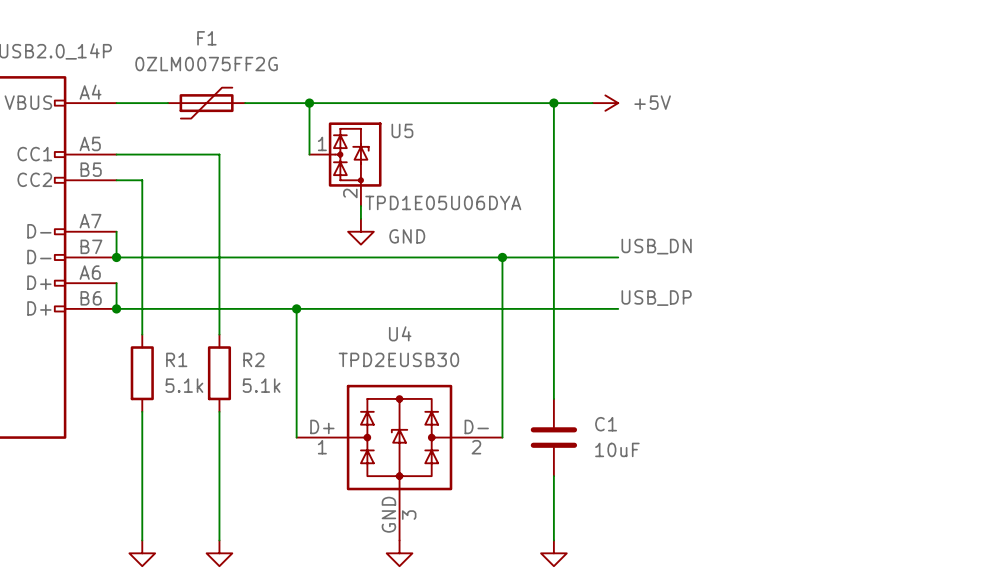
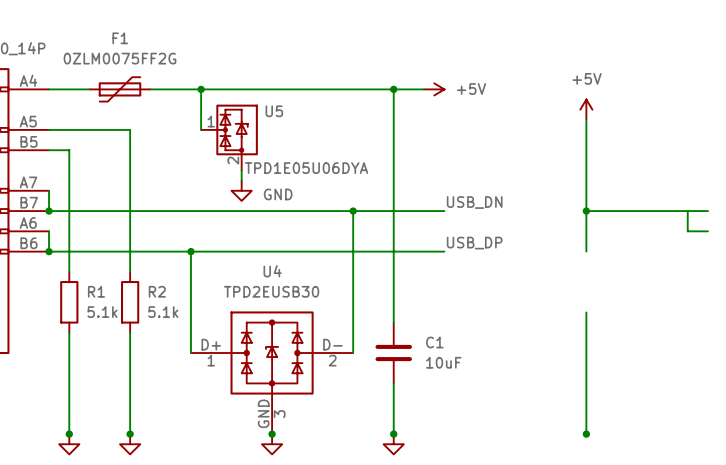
power symbol: none -> +5V (586, 109)
wire: none -> (586, 119) (586, 251)
wire: none -> (586, 211) (708, 211)
junction: none -> (586, 211)
wire: none -> (687, 211) (687, 231) (708, 231)
wire: none -> (586, 312) (586, 434)
junction: none -> (69, 434)
junction: none -> (130, 434)
junction: none -> (272, 434)
junction: none -> (393, 434)
junction: none -> (586, 434)

